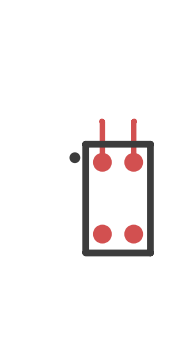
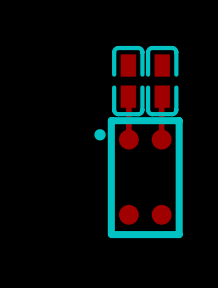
part: none -> (128, 81)
part: none -> (162, 81)

